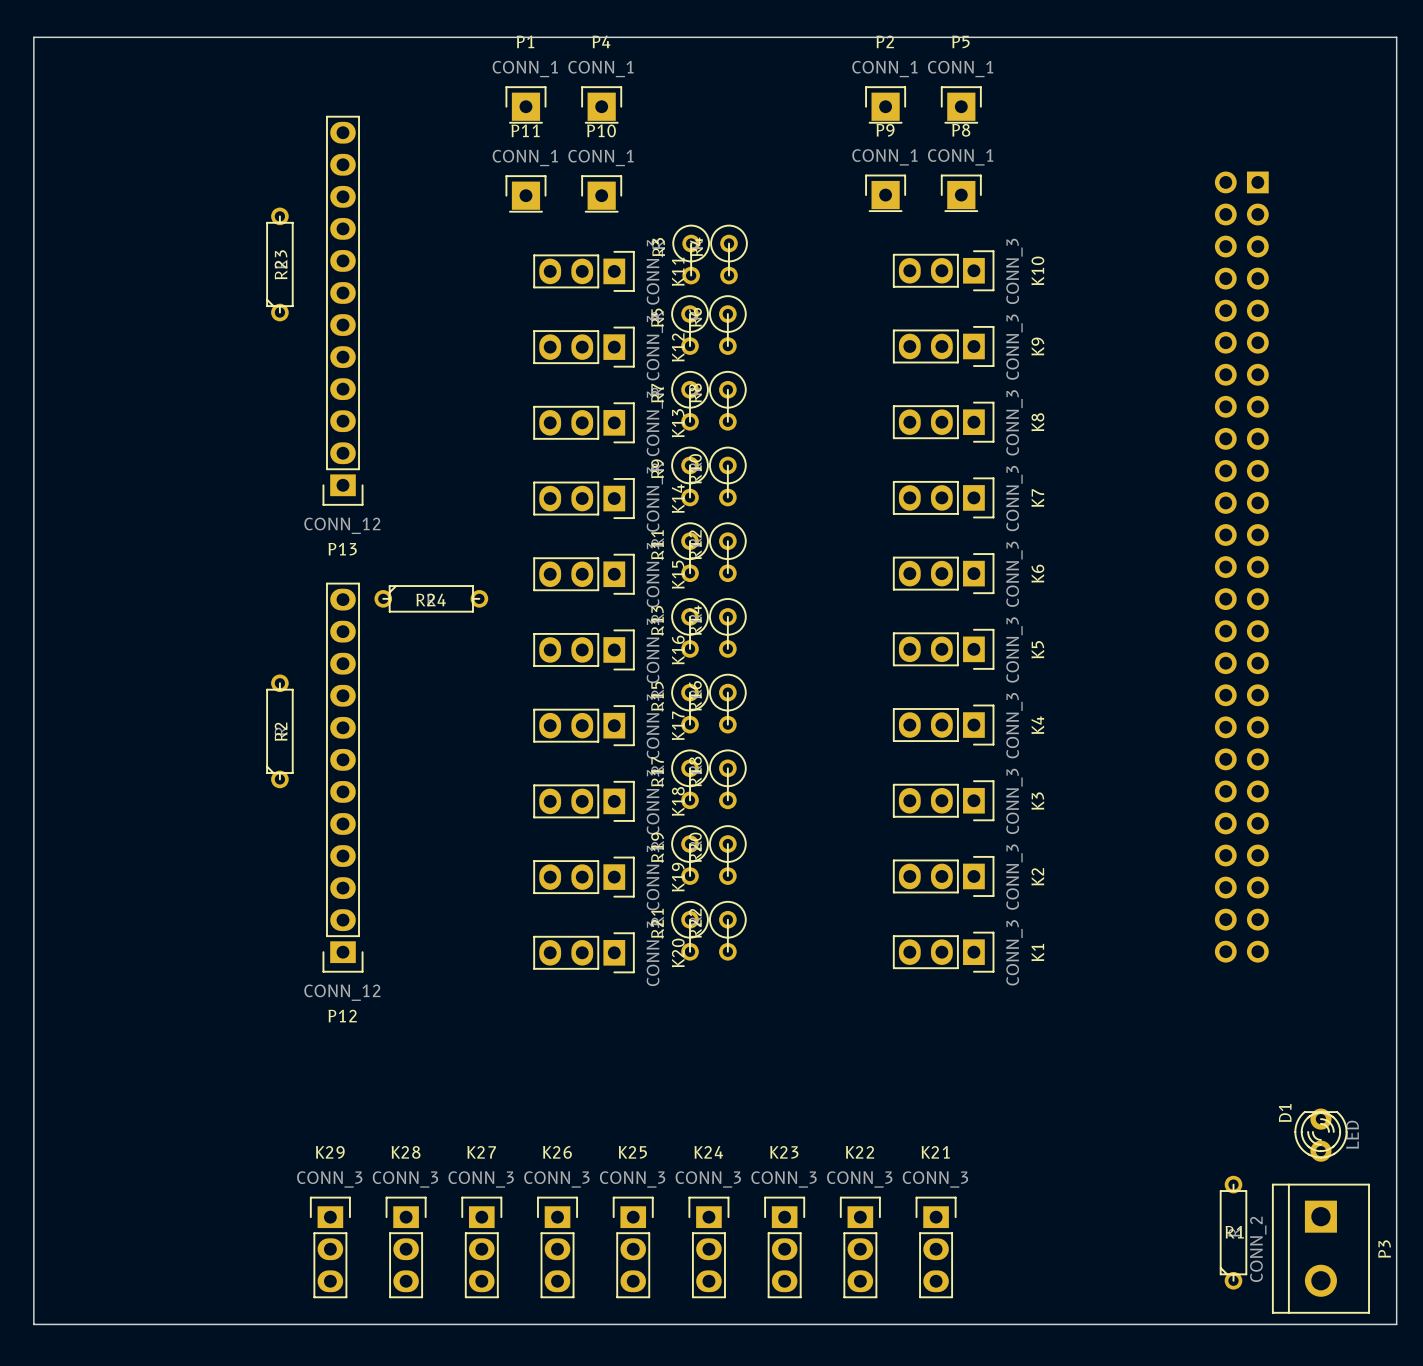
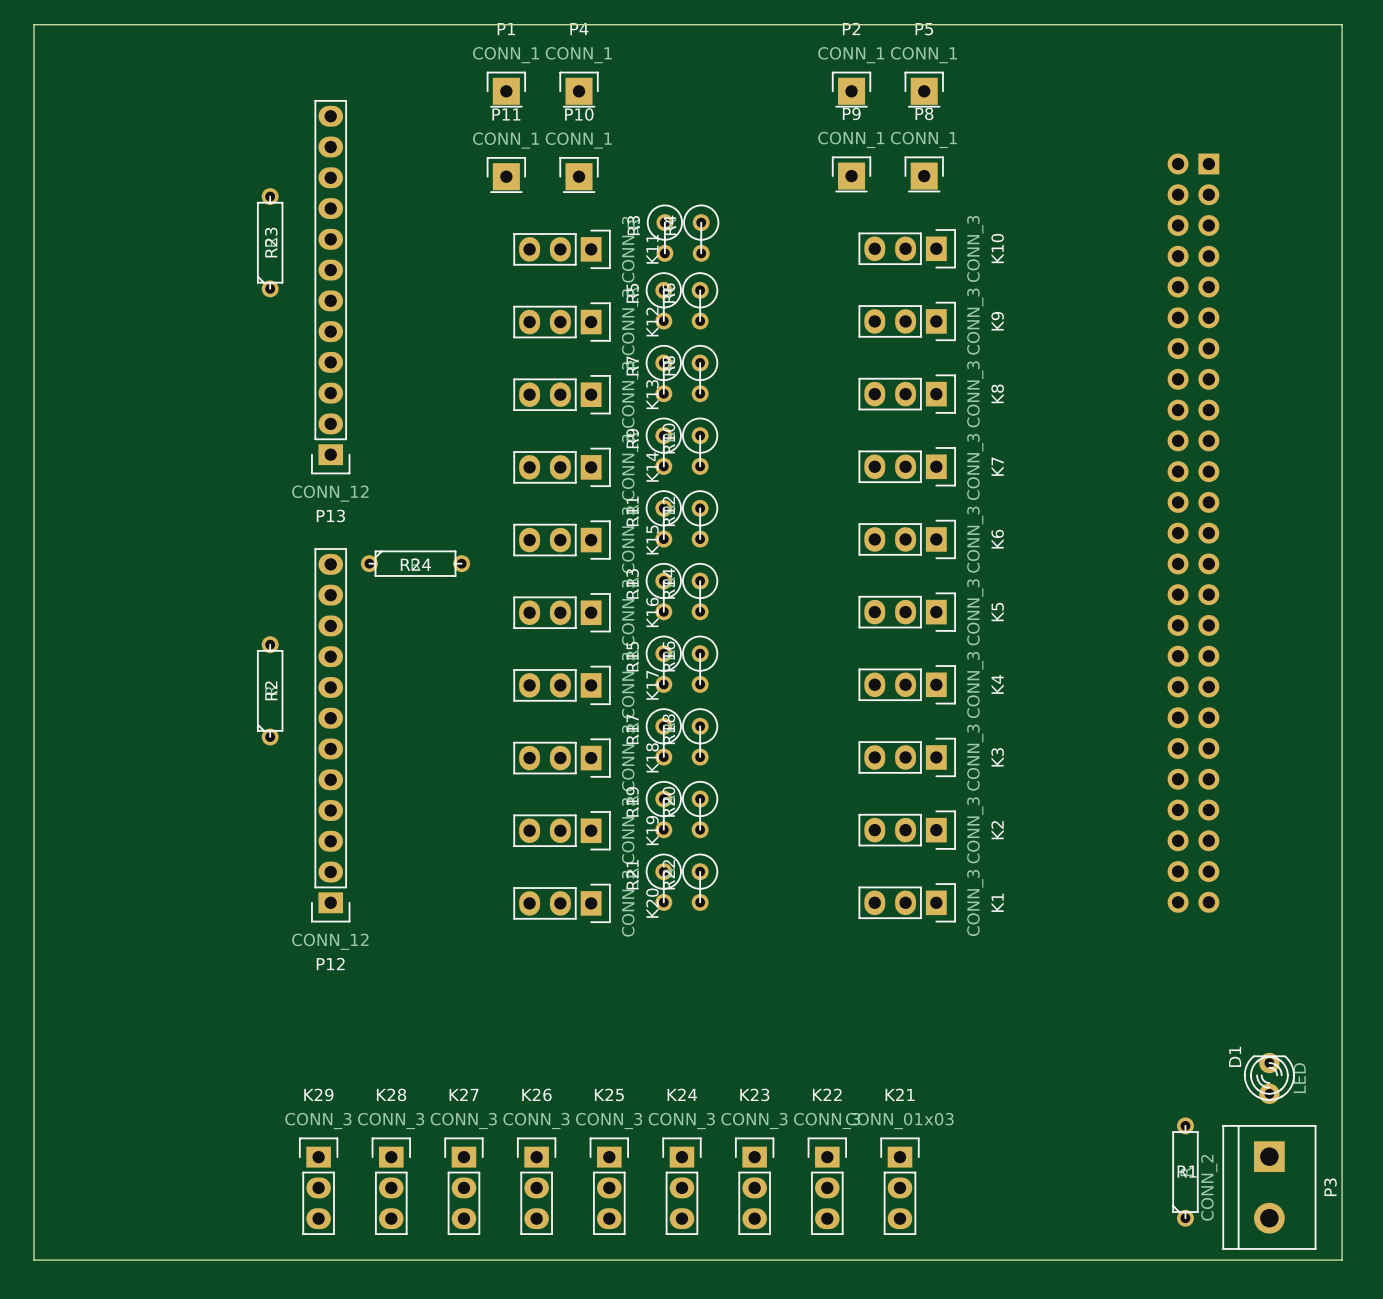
K21 value: CONN_3 (935, 1179) -> CONN_01x03 (899, 1121)

